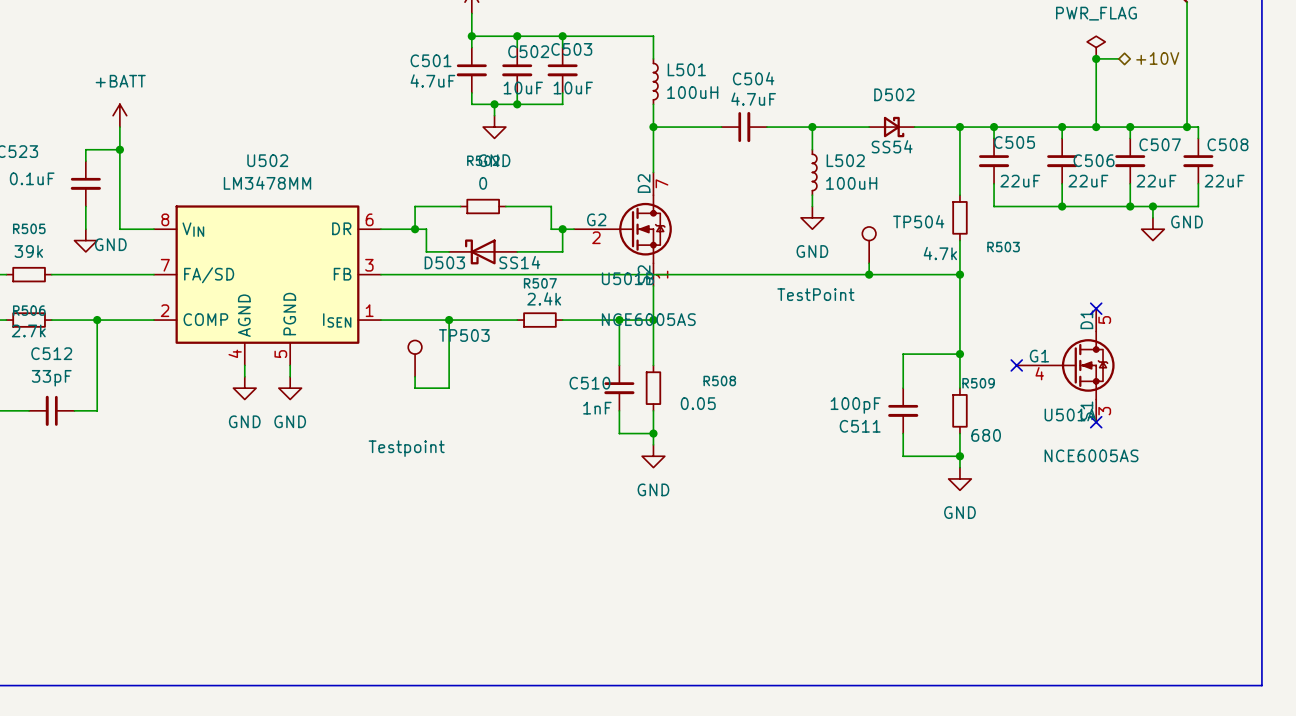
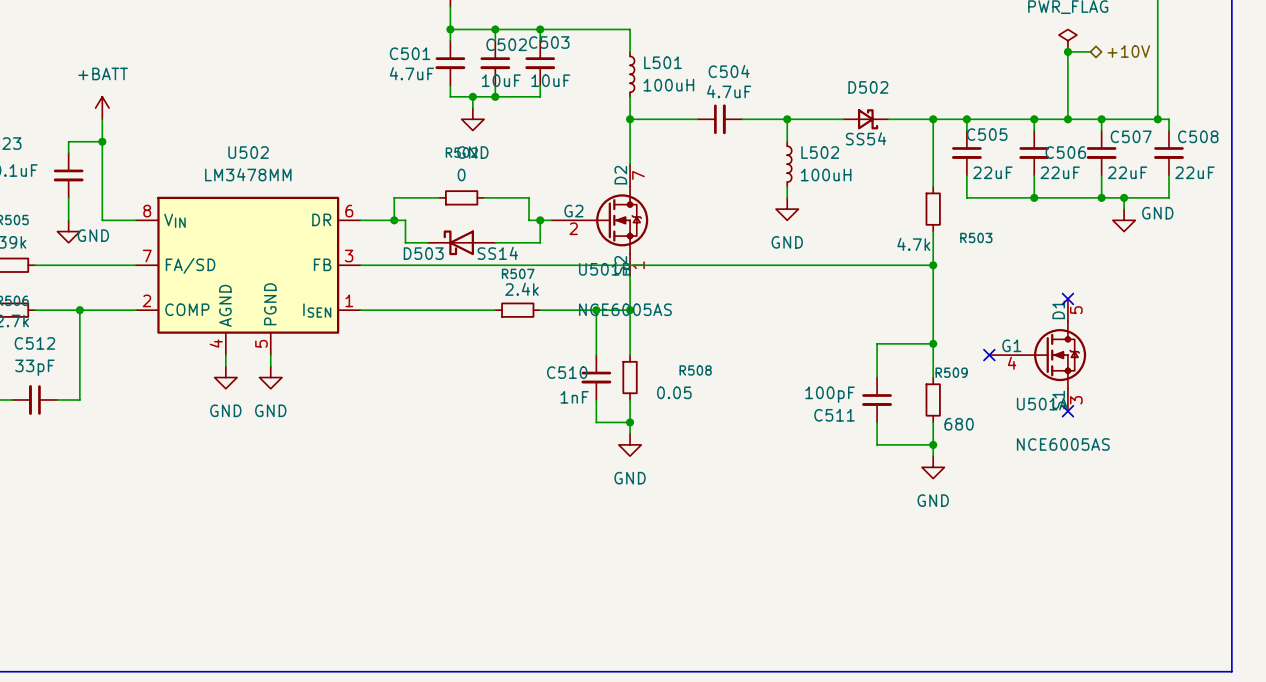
TP504: TestPoint (869, 245) -> none
wire: (869, 263) (869, 274) -> none
junction: (869, 274) -> none
wire: (449, 320) (449, 388) (415, 388) (415, 376) -> none
junction: (449, 320) -> none
TP503: Testpoint (415, 358) -> none

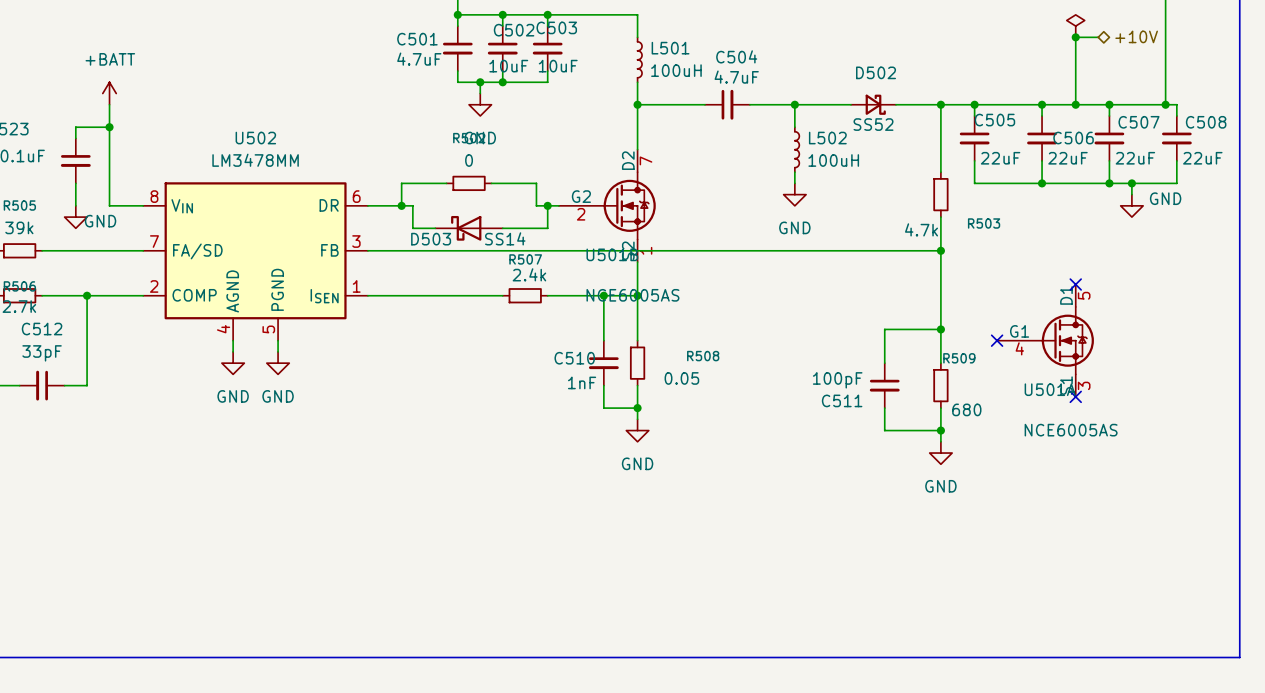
D502 value: SS54 (866, 138) -> SS52 (873, 124)

